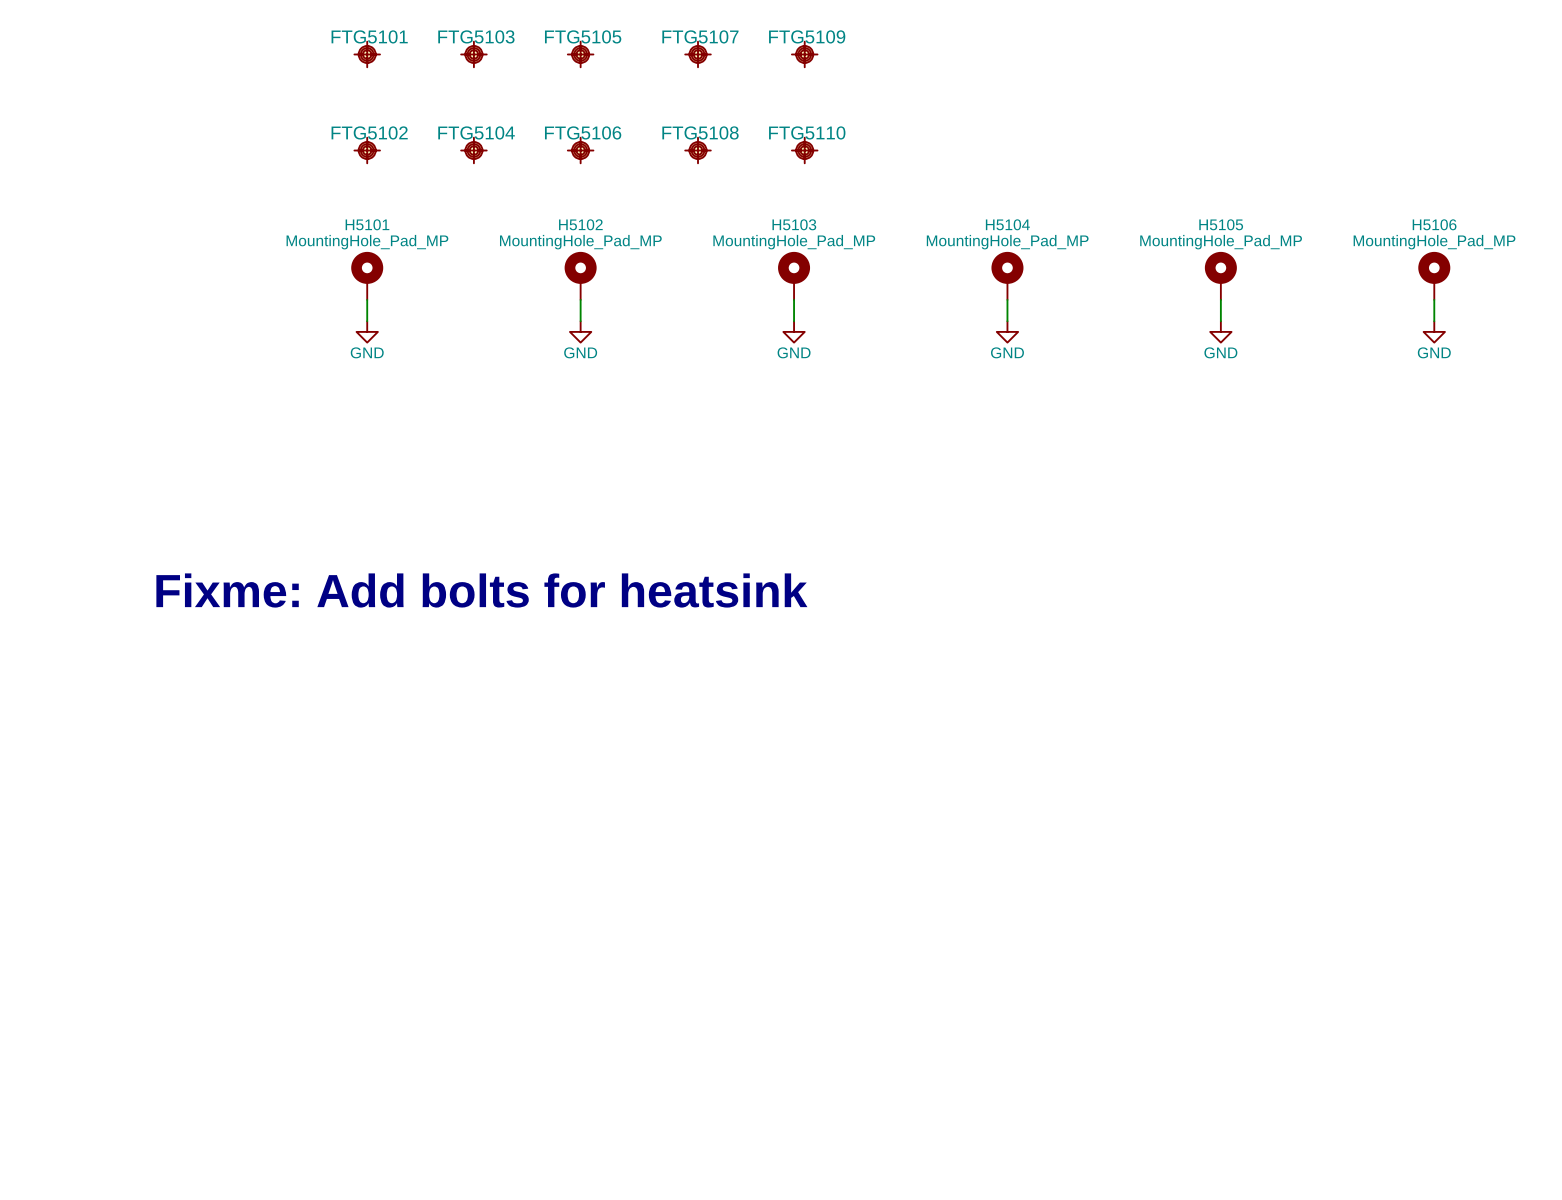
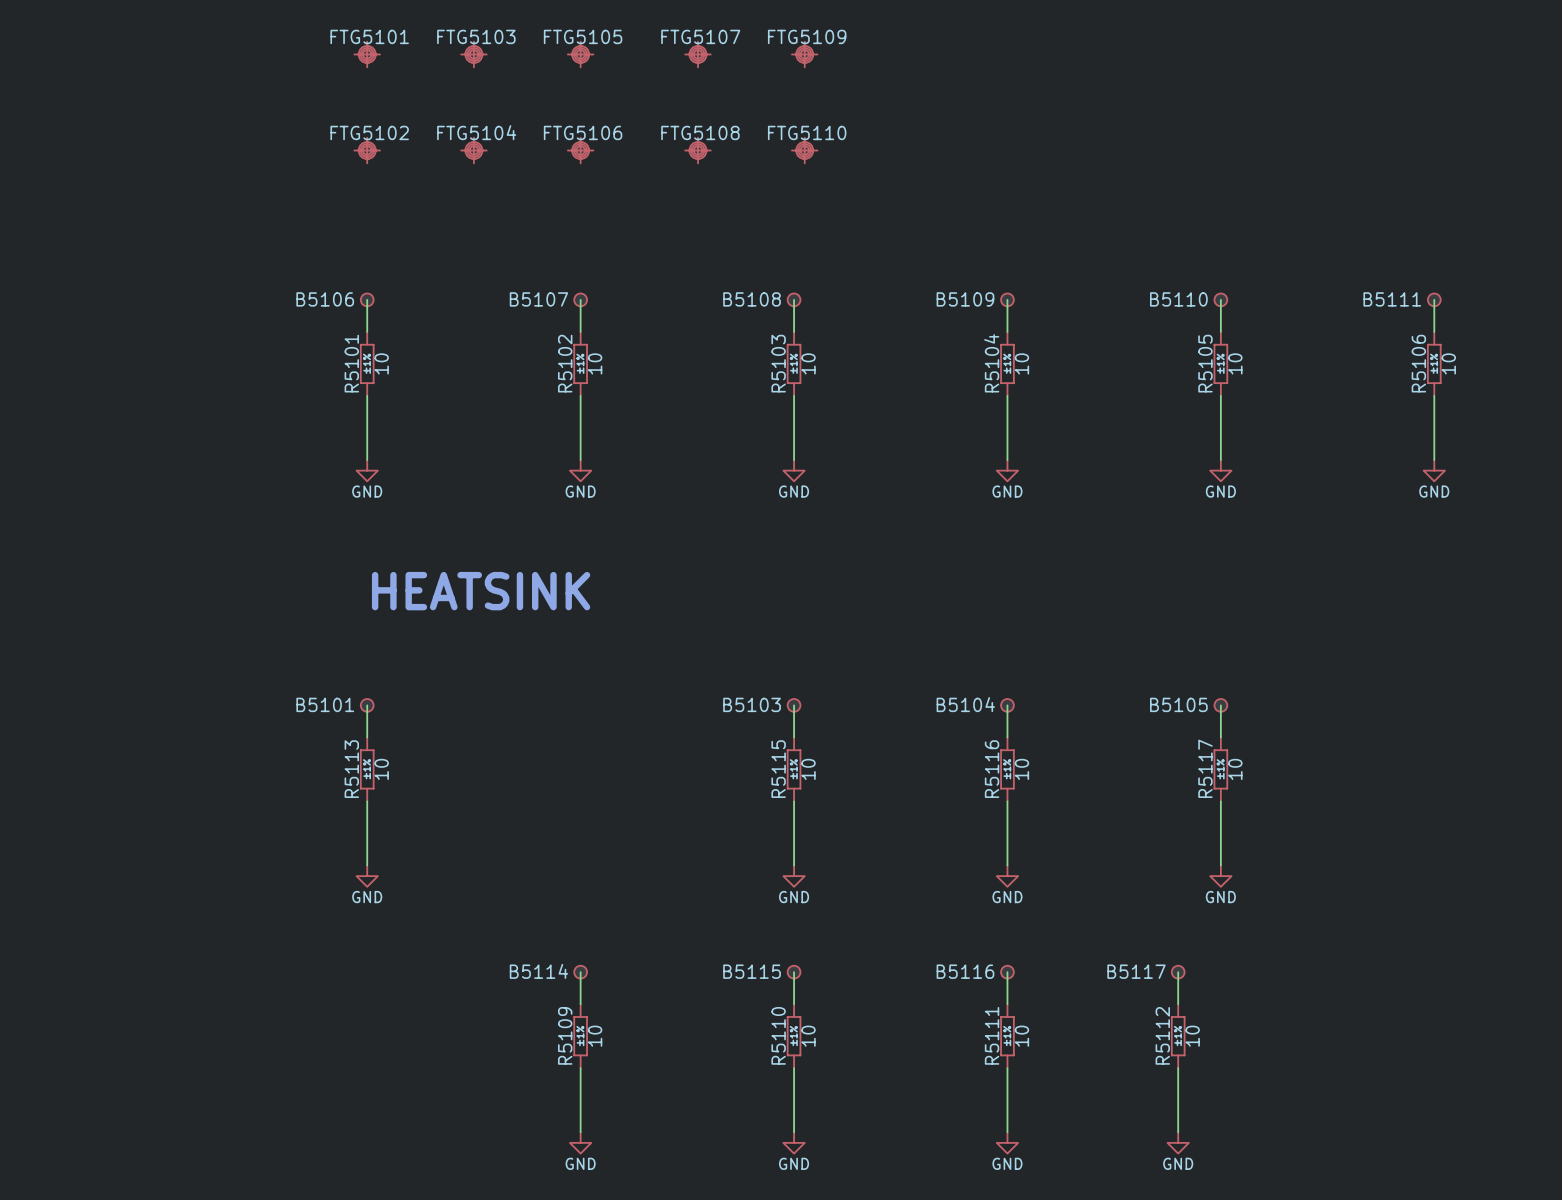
H5101: MountingHole_Pad_MP (367, 275) -> none
H5102: MountingHole_Pad_MP (580, 275) -> none
H5103: MountingHole_Pad_MP (794, 275) -> none
H5104: MountingHole_Pad_MP (1007, 275) -> none
H5105: MountingHole_Pad_MP (1220, 275) -> none
H5106: MountingHole_Pad_MP (1434, 275) -> none
B5106: none -> (367, 299)
B5107: none -> (580, 299)
B5108: none -> (794, 299)
B5109: none -> (1007, 299)
B5110: none -> (1220, 299)
B5111: none -> (1434, 299)
power symbol: GND (367, 331) -> none
power symbol: GND (580, 331) -> none
power symbol: GND (794, 331) -> none
power symbol: GND (1007, 331) -> none
power symbol: GND (1220, 331) -> none
power symbol: GND (1434, 331) -> none
R5101: none -> 10 (367, 363)
R5102: none -> 10 (580, 363)
R5103: none -> 10 (794, 363)
R5104: none -> 10 (1007, 363)
R5105: none -> 10 (1220, 363)
R5106: none -> 10 (1434, 363)
wire: none -> (367, 395) (367, 459)
wire: none -> (580, 395) (580, 459)
wire: none -> (794, 395) (794, 459)
wire: none -> (1007, 395) (1007, 459)
wire: none -> (1220, 395) (1220, 459)
wire: none -> (1434, 395) (1434, 459)
power symbol: none -> GND (367, 470)
power symbol: none -> GND (580, 470)
power symbol: none -> GND (794, 470)
power symbol: none -> GND (1007, 470)
power symbol: none -> GND (1220, 470)
power symbol: none -> GND (1434, 470)
text: Fixme: Add bolts for heatsink (481, 590) -> HEATSINK (481, 591)
wire: none -> (367, 705) (367, 737)
B5101: none -> (367, 705)
wire: none -> (794, 705) (794, 737)
B5103: none -> (794, 705)
wire: none -> (1007, 705) (1007, 737)
B5104: none -> (1007, 705)
wire: none -> (1220, 705) (1220, 737)
B5105: none -> (1220, 705)
R5113: none -> 10 (367, 769)
R5115: none -> 10 (794, 769)
R5116: none -> 10 (1007, 769)
R5117: none -> 10 (1220, 769)
wire: none -> (367, 801) (367, 865)
wire: none -> (794, 801) (794, 865)
wire: none -> (1007, 801) (1007, 865)
wire: none -> (1220, 801) (1220, 865)
power symbol: none -> GND (367, 876)
power symbol: none -> GND (794, 876)
power symbol: none -> GND (1007, 876)
power symbol: none -> GND (1220, 876)
wire: none -> (580, 972) (580, 1004)
B5114: none -> (580, 972)
wire: none -> (794, 972) (794, 1004)
B5115: none -> (794, 972)
wire: none -> (1007, 972) (1007, 1004)
B5116: none -> (1007, 972)
wire: none -> (1178, 972) (1178, 1004)
B5117: none -> (1178, 972)
R5109: none -> 10 (580, 1036)
R5110: none -> 10 (794, 1036)
R5111: none -> 10 (1007, 1036)
R5112: none -> 10 (1178, 1036)
wire: none -> (580, 1068) (580, 1132)
wire: none -> (794, 1068) (794, 1132)
wire: none -> (1007, 1068) (1007, 1132)
wire: none -> (1178, 1068) (1178, 1132)
power symbol: none -> GND (580, 1142)
power symbol: none -> GND (794, 1142)
power symbol: none -> GND (1007, 1142)
power symbol: none -> GND (1178, 1142)

